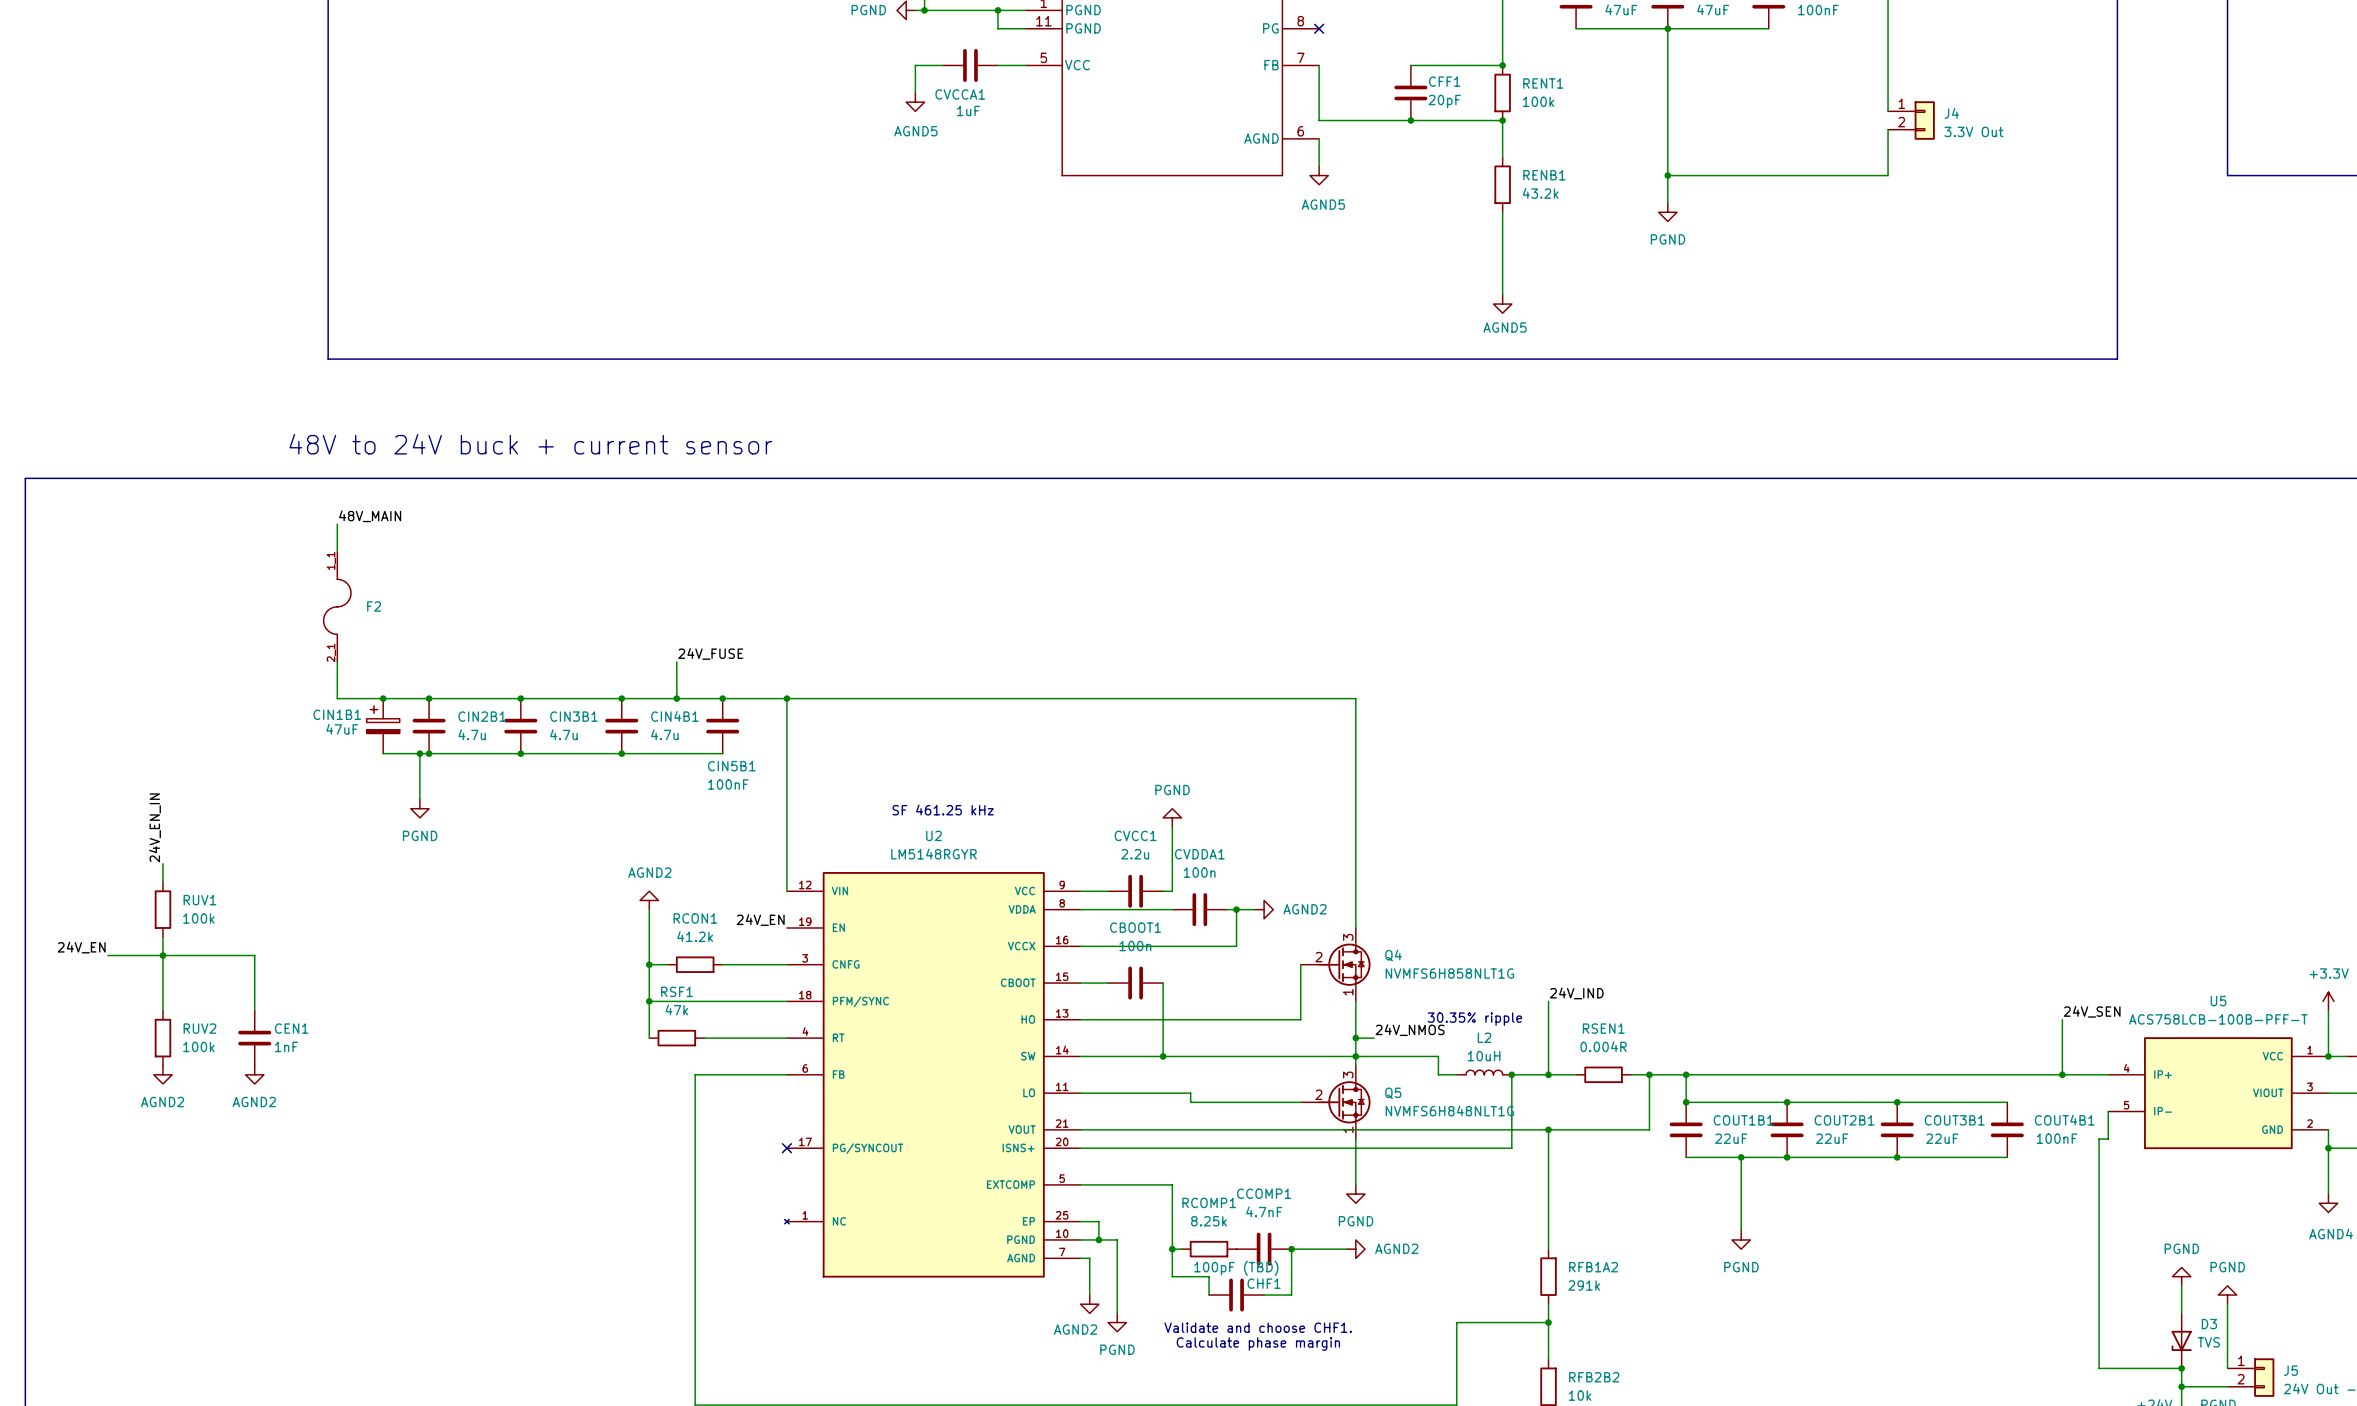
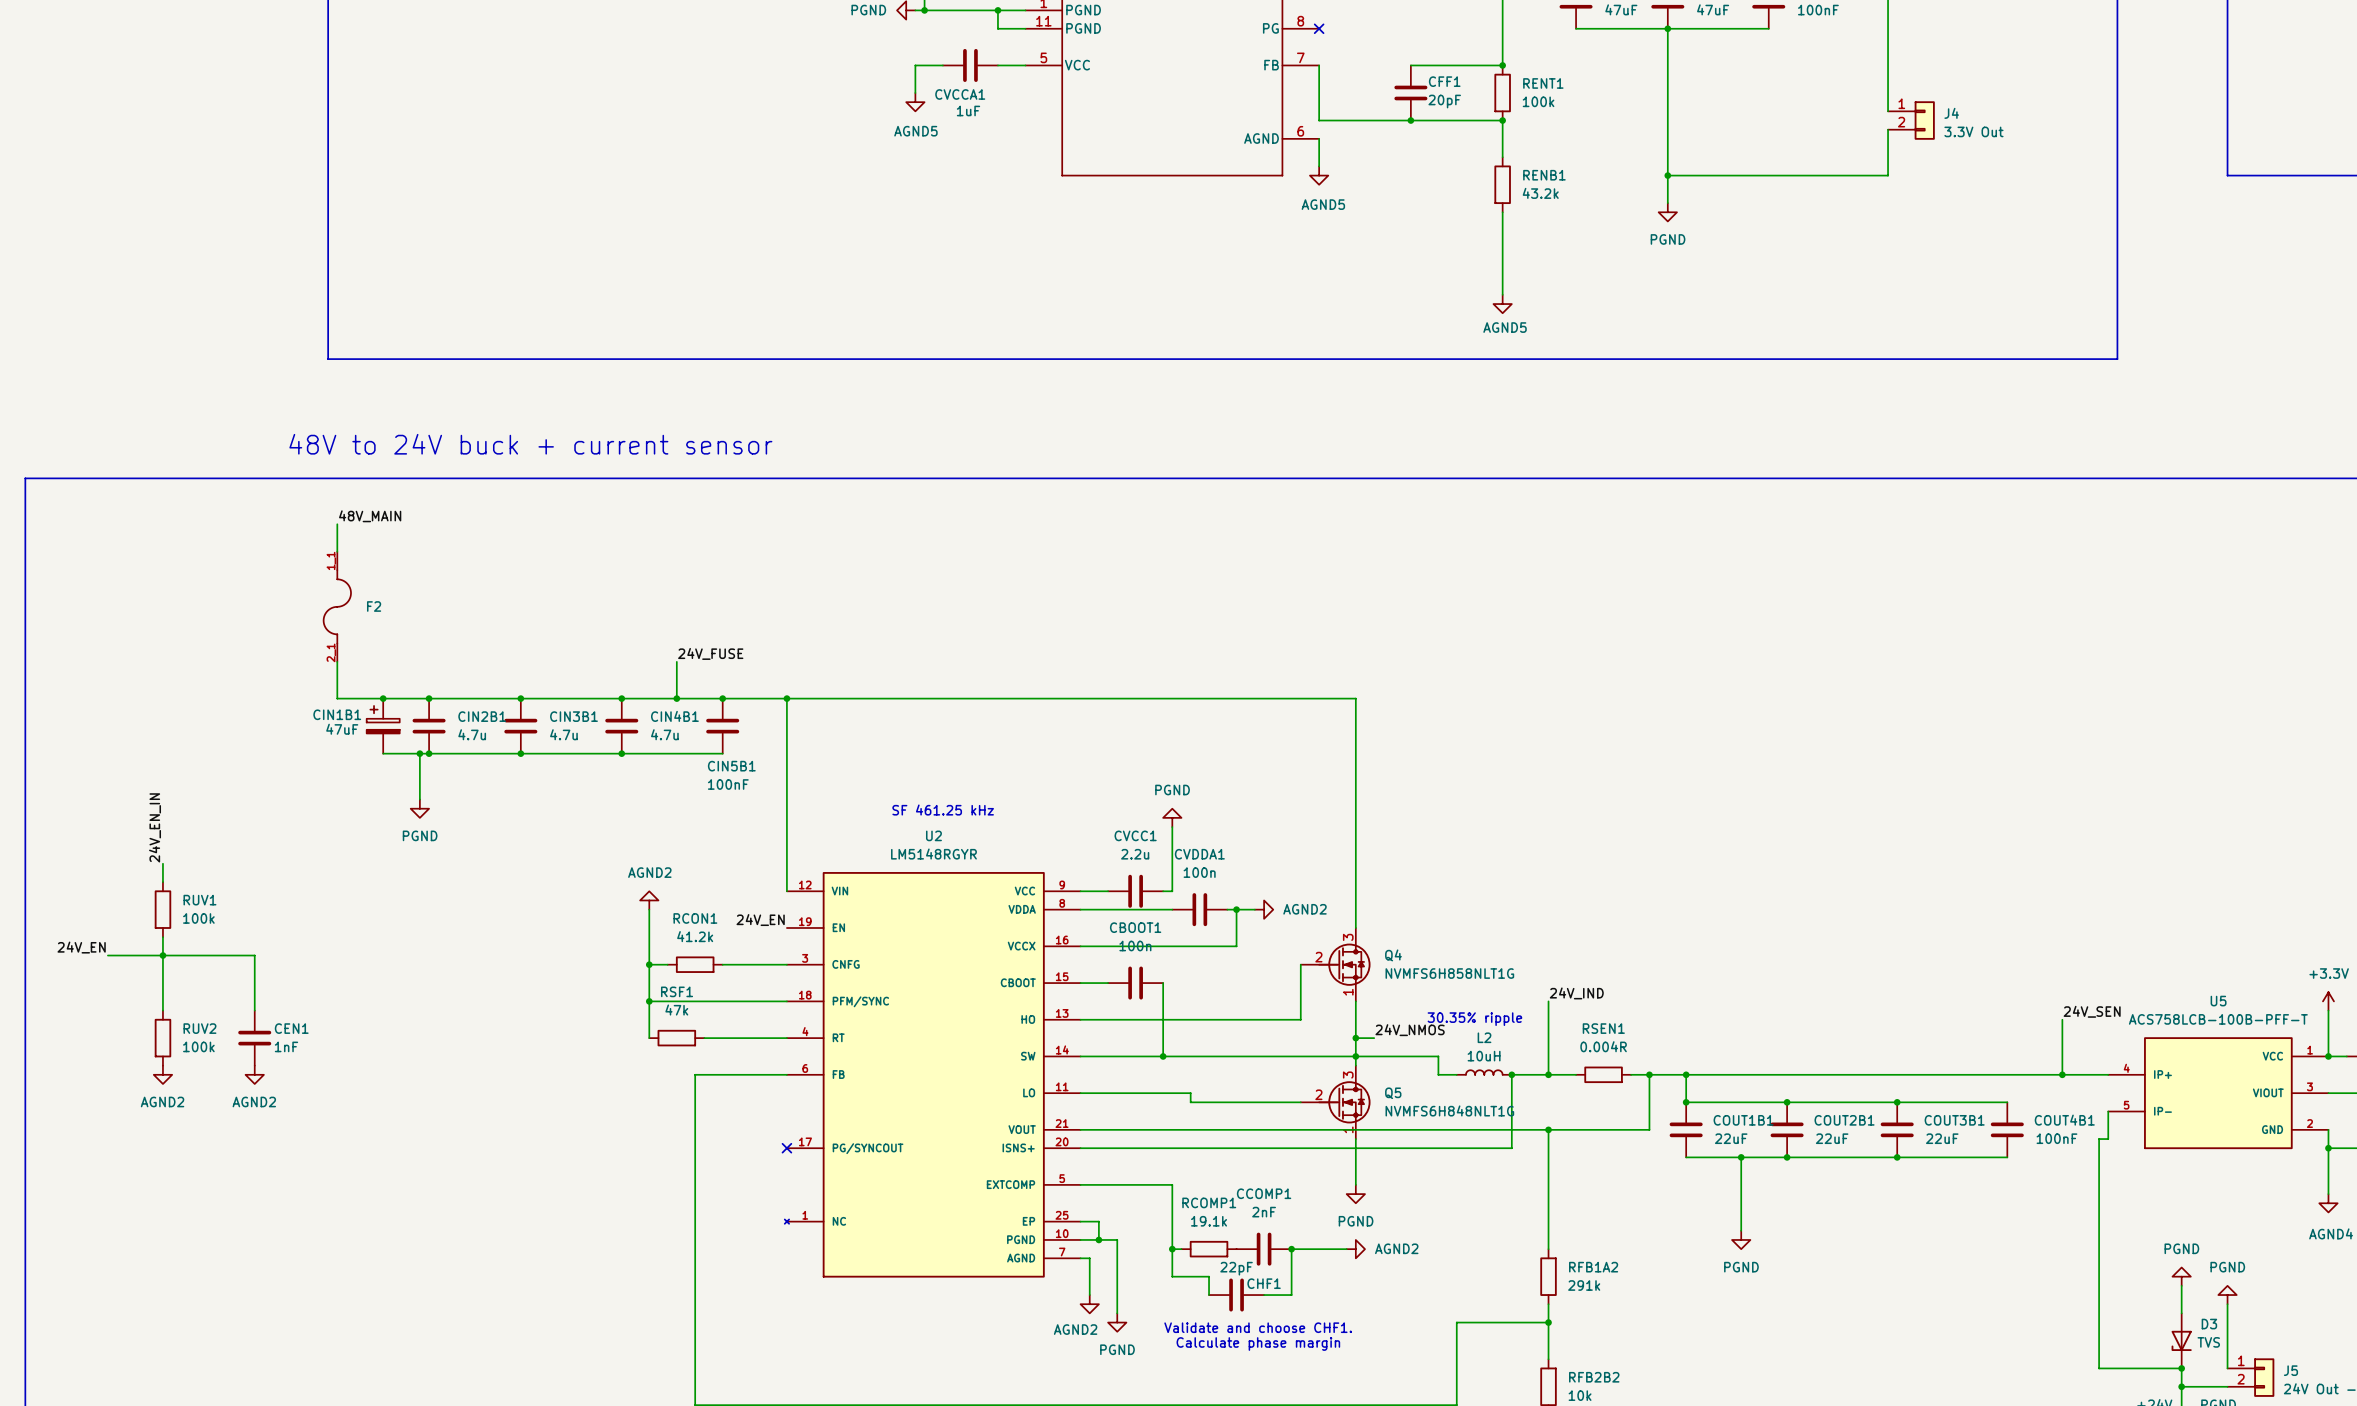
CCOMP1 value: 4.7nF (1264, 1211) -> 2nF (1264, 1212)
RCOMP1 value: 8.25k (1209, 1221) -> 19.1k (1209, 1221)
CHF1 value: 100pF (TBD) (1236, 1268) -> 22pF (1236, 1268)

